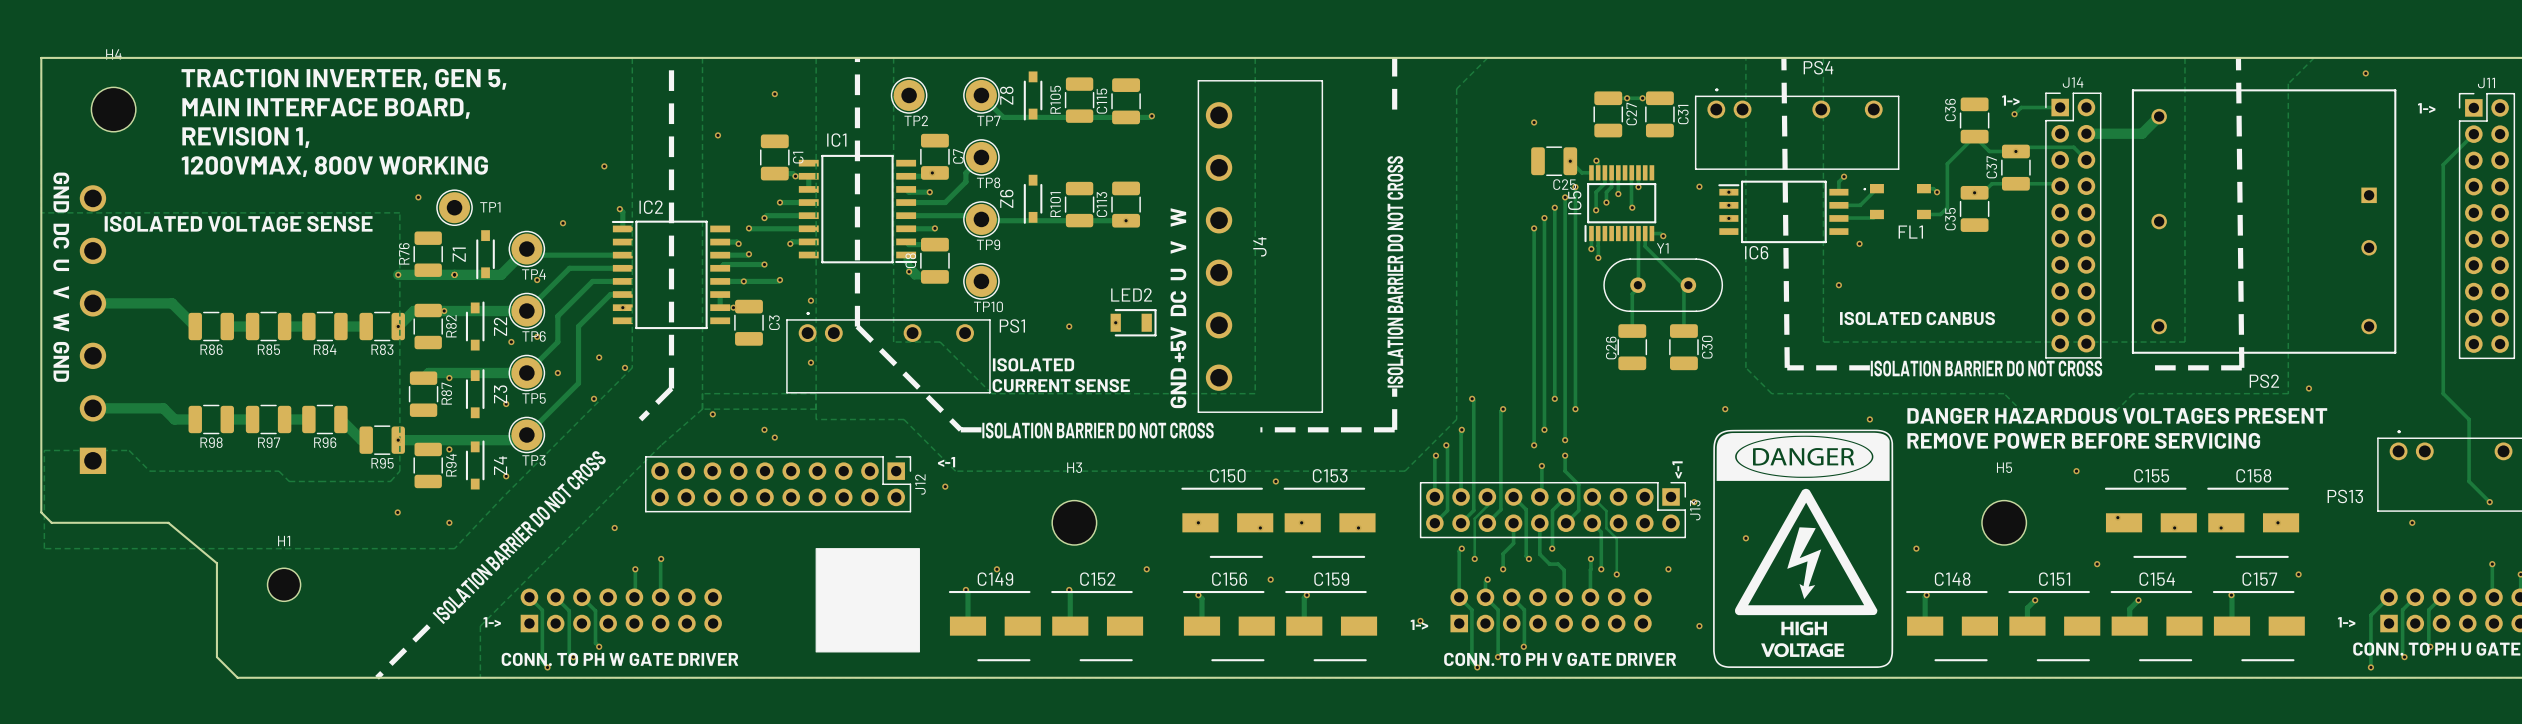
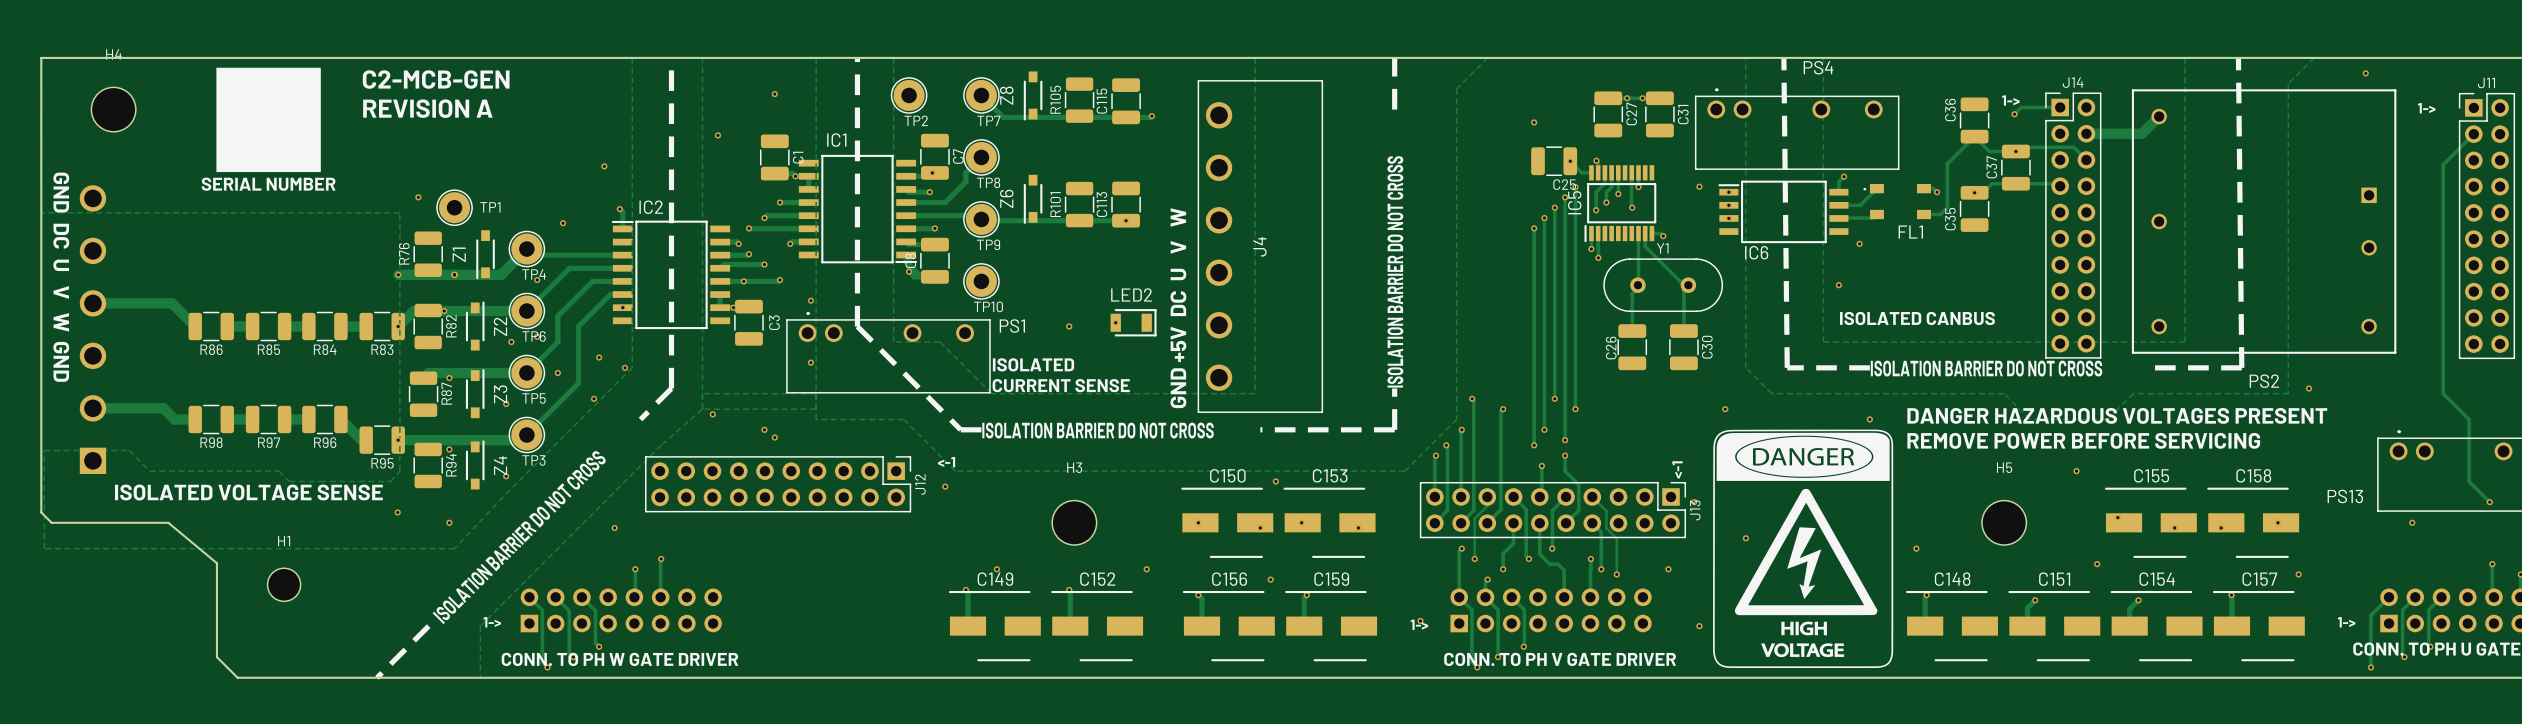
drawing: none -> [216, 67, 321, 173]
text: TRACTION INVERTER, GEN 5, (343, 79) -> none
text: none -> C2-MCB-GEN (436, 79)
text: MAIN INTERFACE BOARD, (326, 108) -> none
text: REVISION 1, (245, 137) -> REVISION A (427, 108)
text: 1200VMAX, 800V WORKING (334, 166) -> none
text: none -> SERIAL NUMBER (268, 184)
text: ISOLATED VOLTAGE SENSE (238, 223) -> none
text: none -> ISOLATED VOLTAGE SENSE (248, 492)
drawing: [815, 548, 920, 653] -> none

